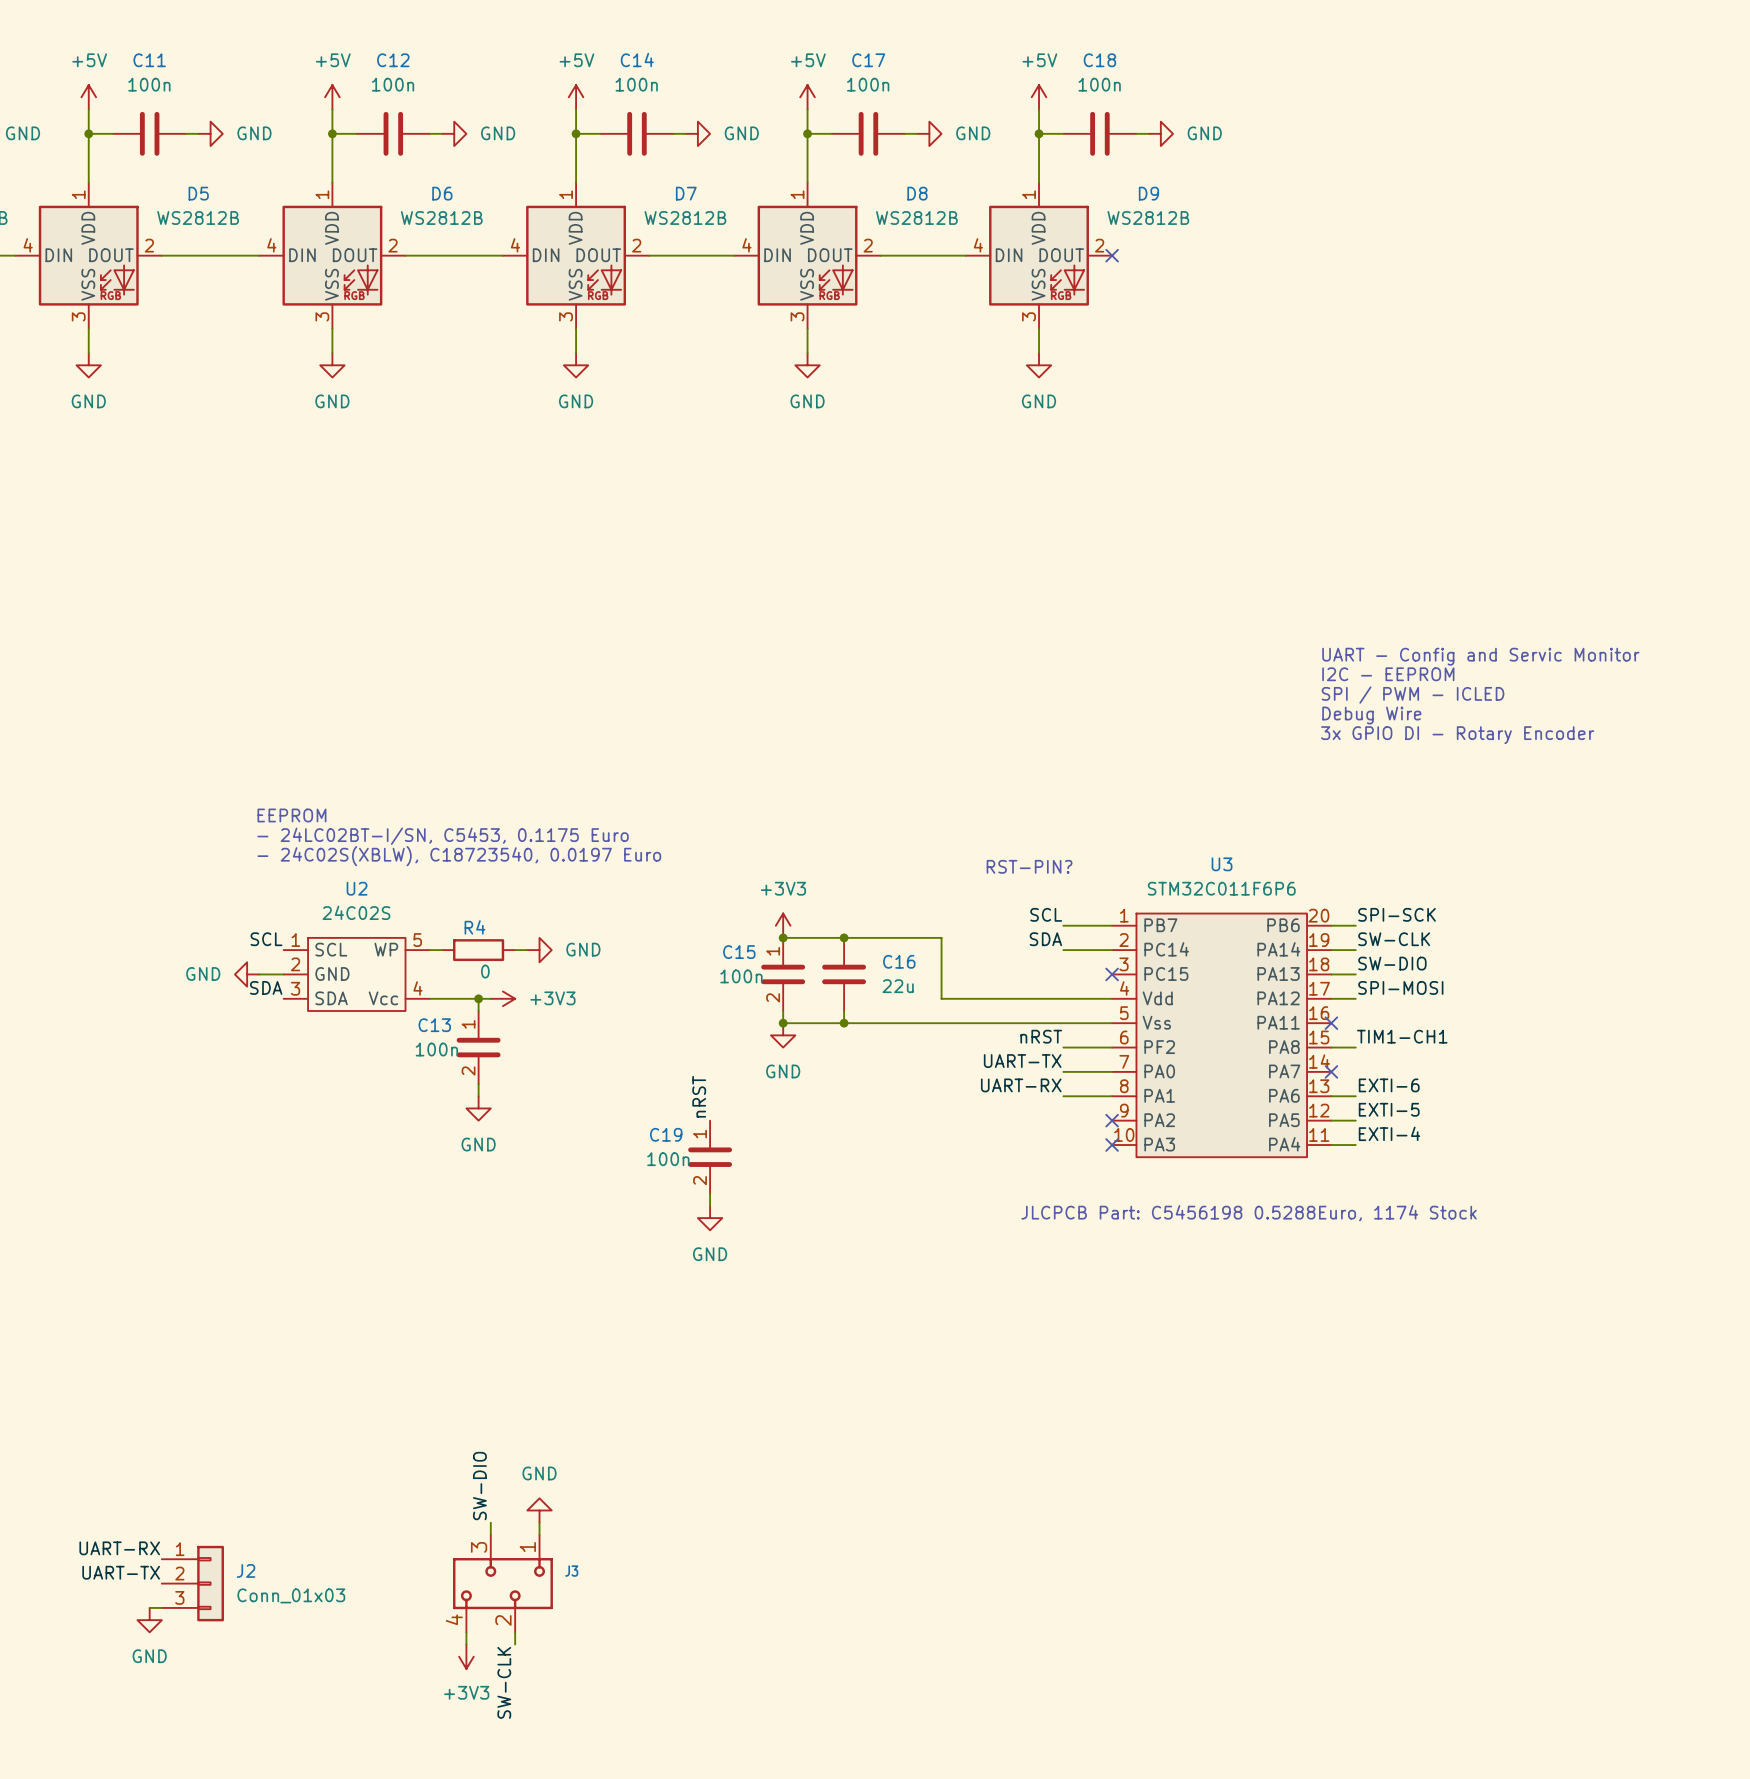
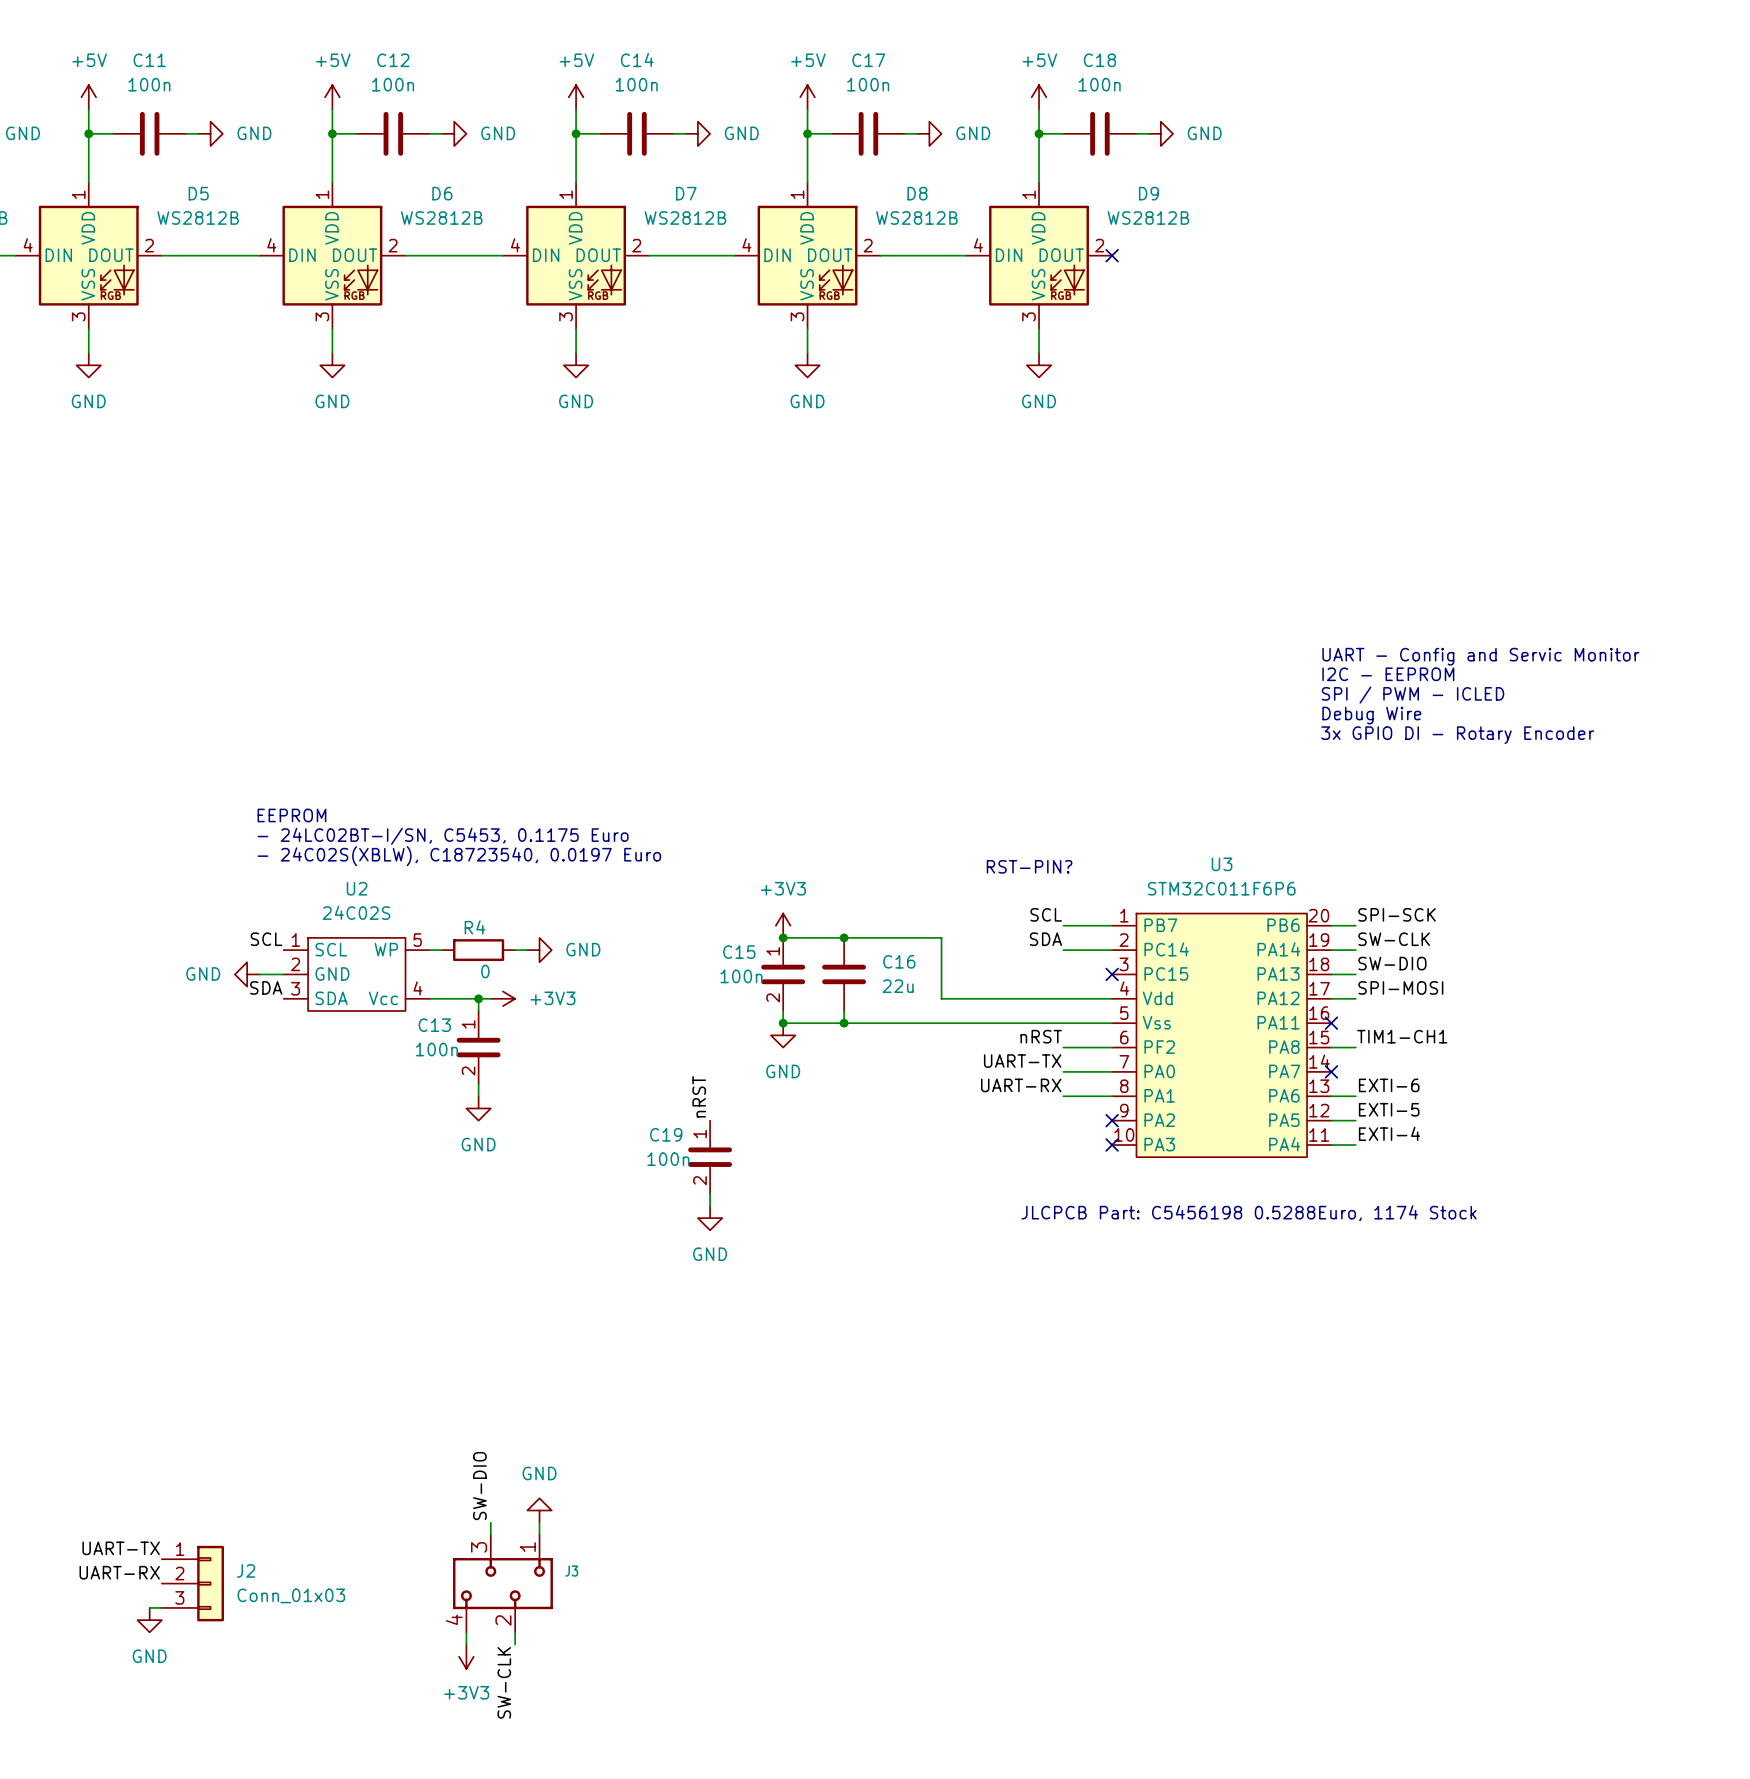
label: UART-RX (119, 1548) -> UART-TX (121, 1548)
label: UART-TX (121, 1572) -> UART-RX (119, 1572)

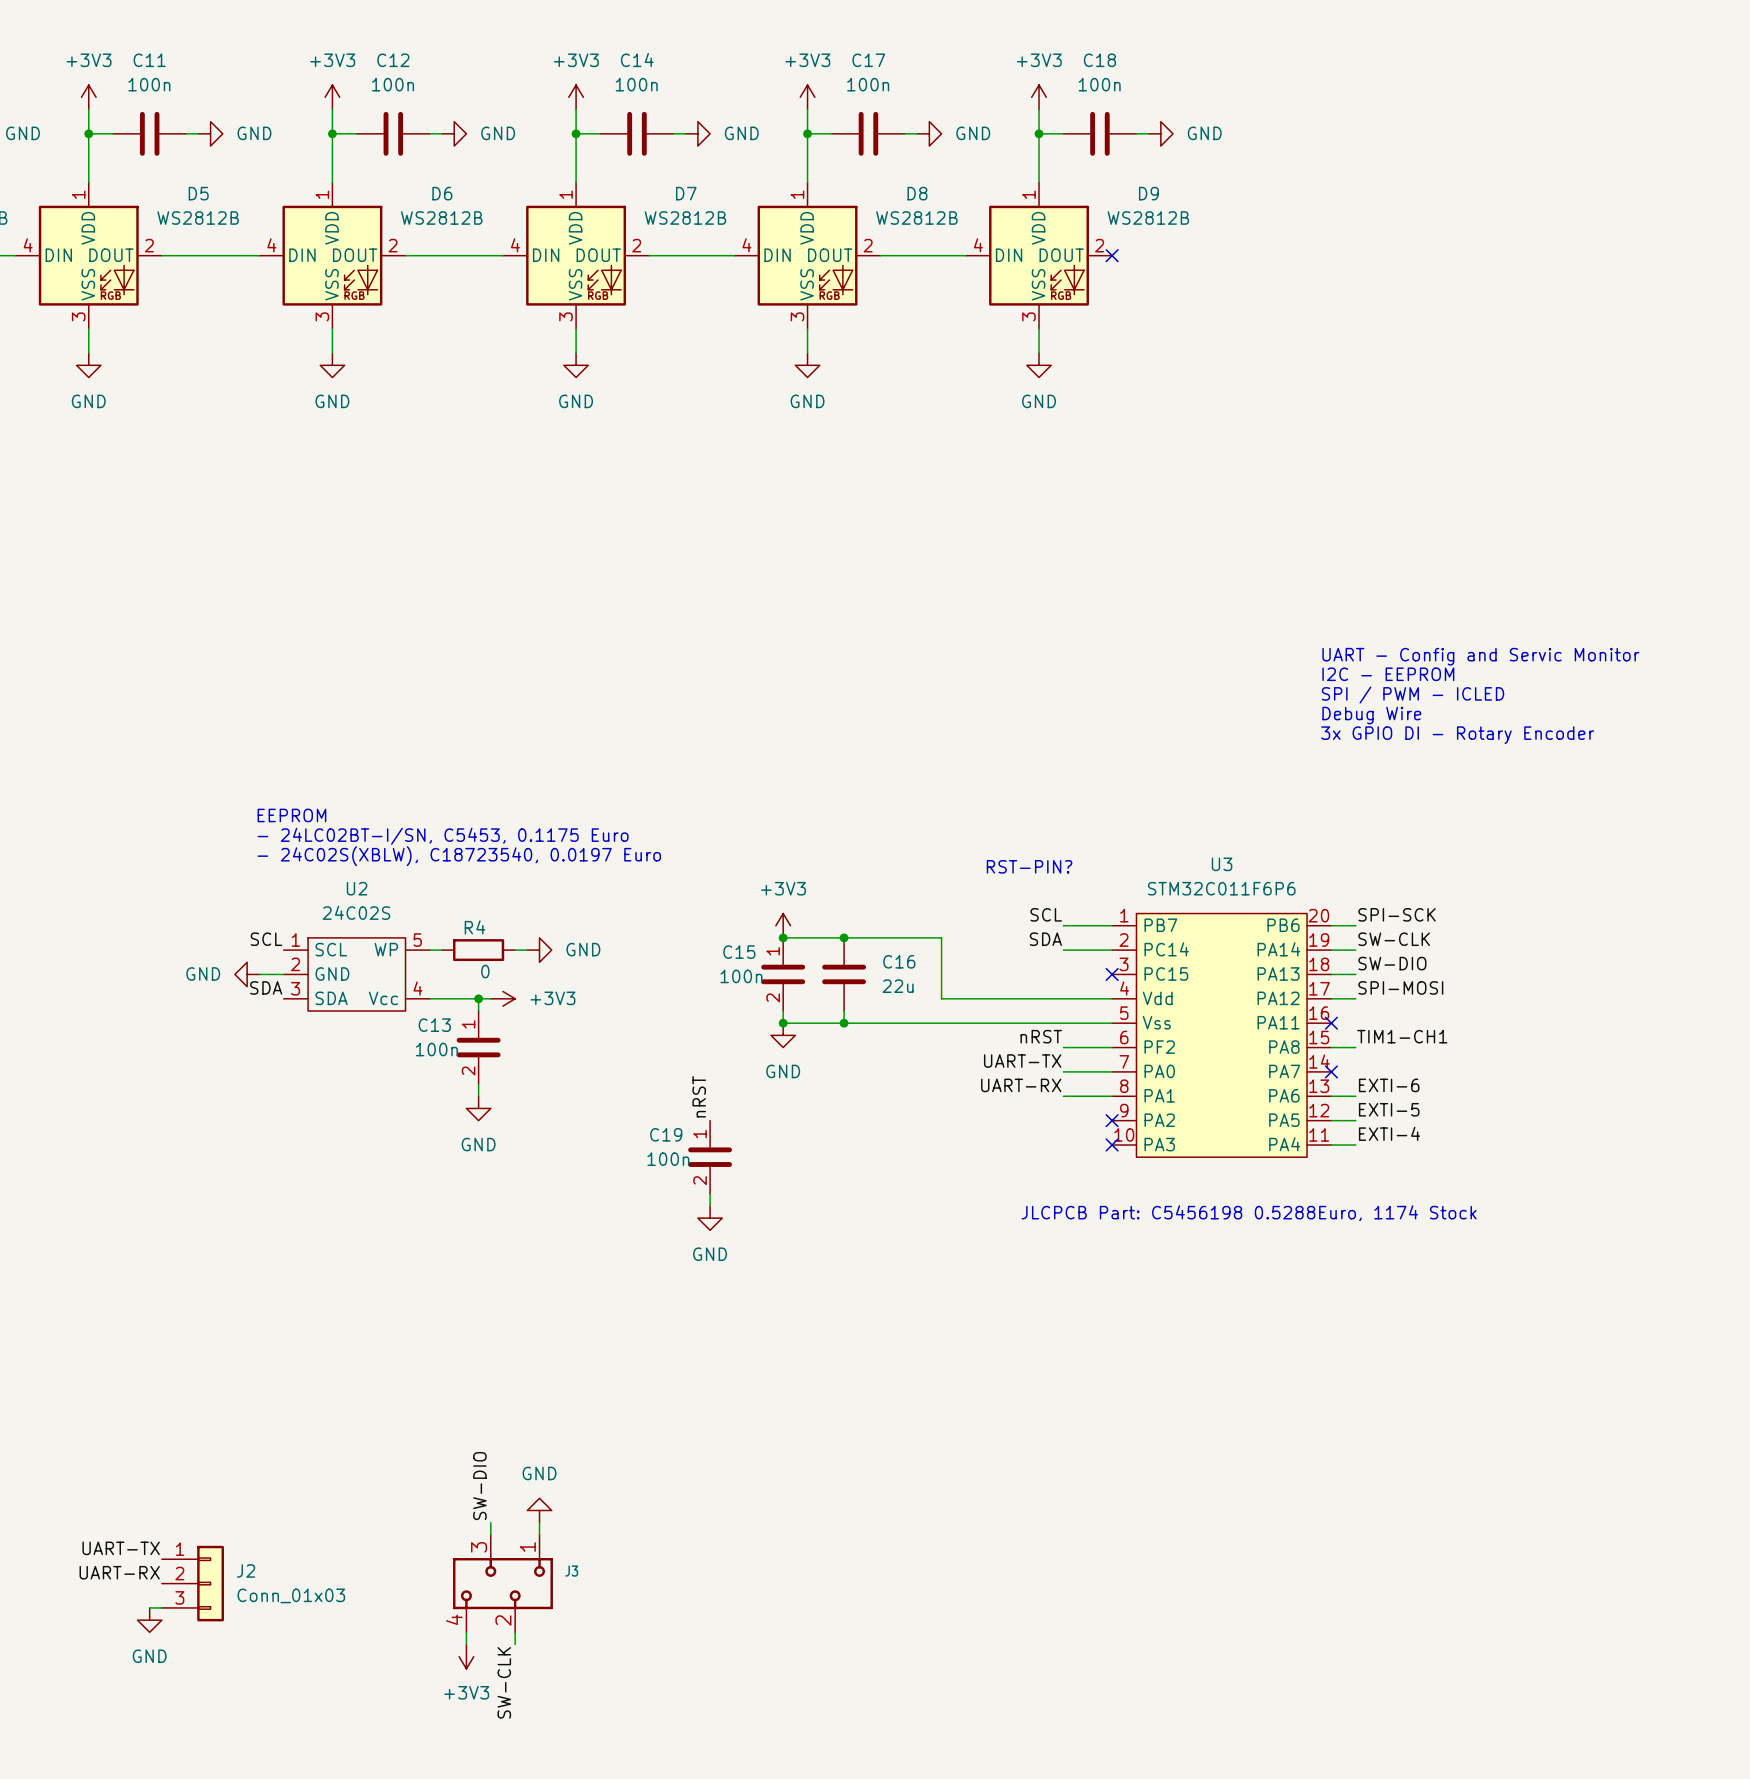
power symbol: +5V (88, 97) -> +3V3 (88, 97)
power symbol: +5V (332, 97) -> +3V3 (332, 97)
power symbol: +5V (576, 97) -> +3V3 (576, 97)
power symbol: +5V (807, 97) -> +3V3 (807, 97)
power symbol: +5V (1039, 97) -> +3V3 (1039, 97)

